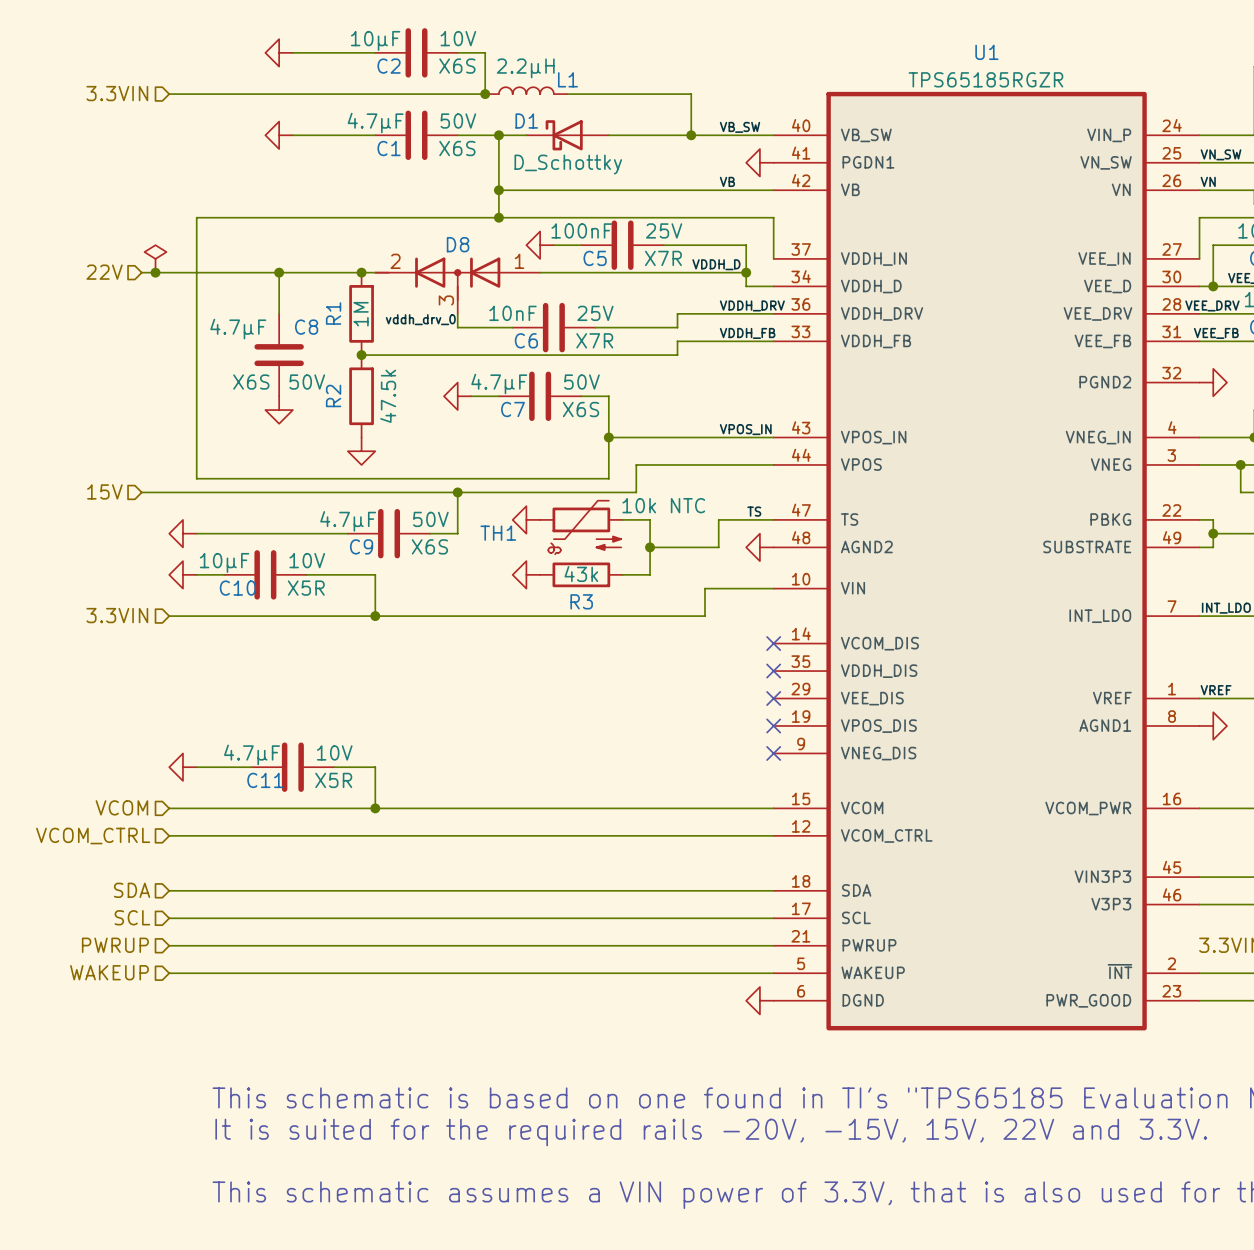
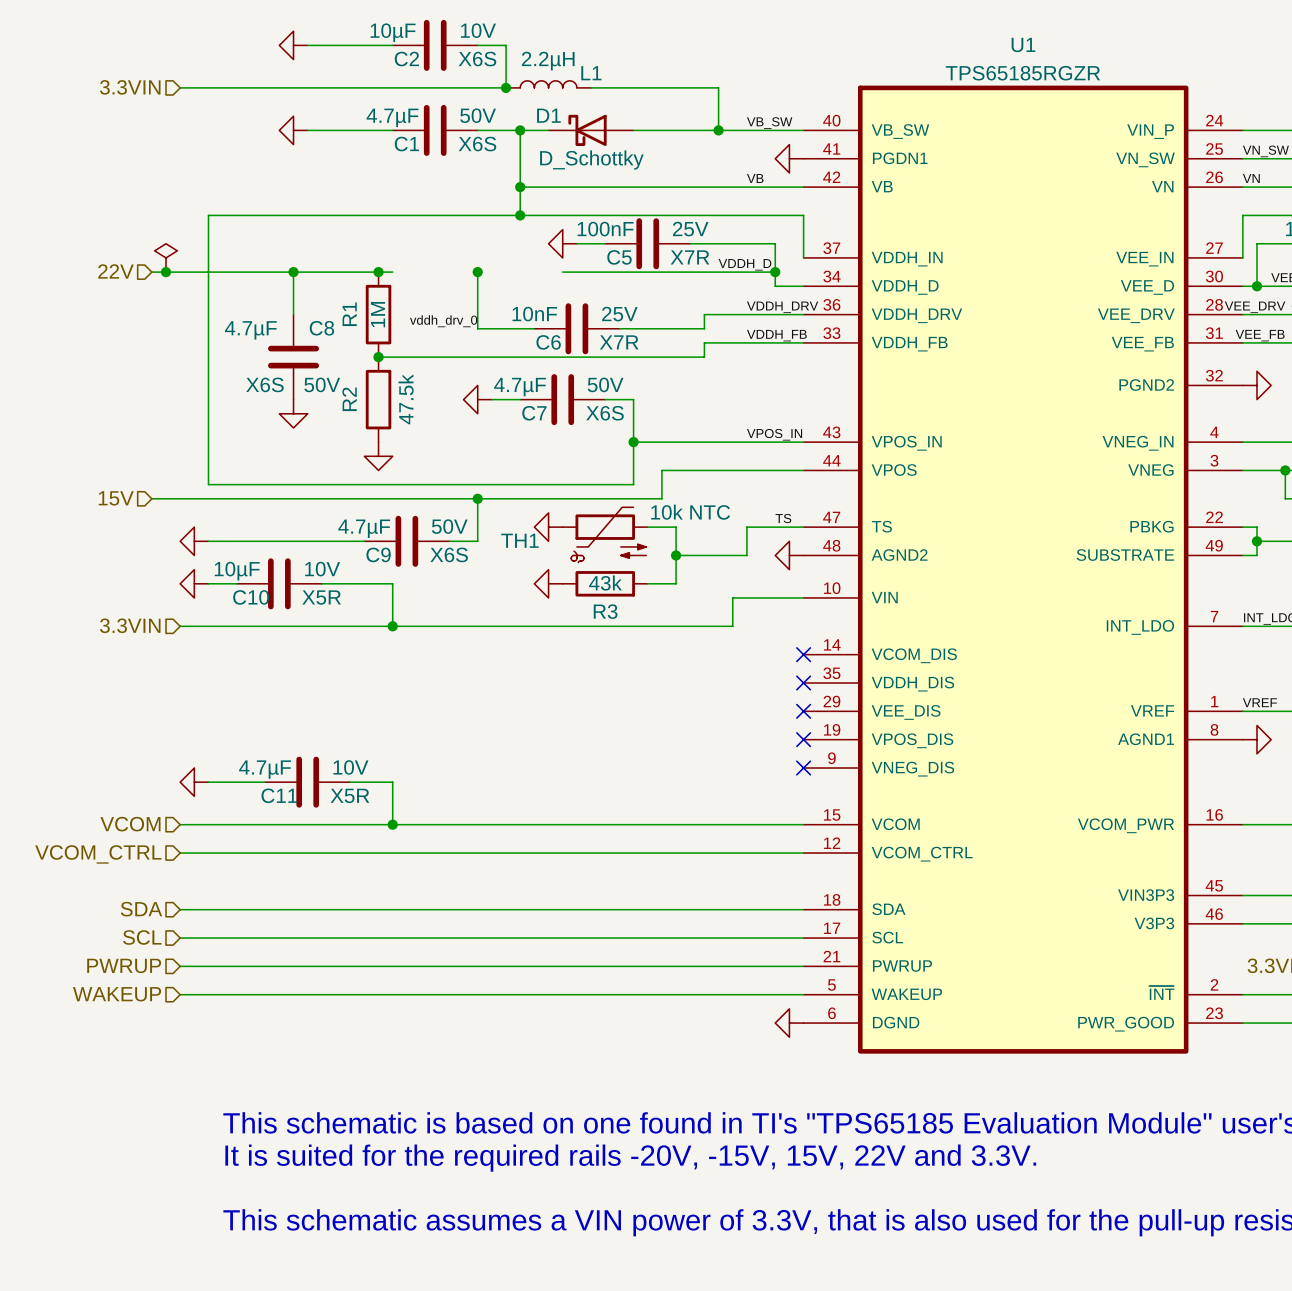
junction: none -> (477, 272)
D8: (457, 285) -> none

